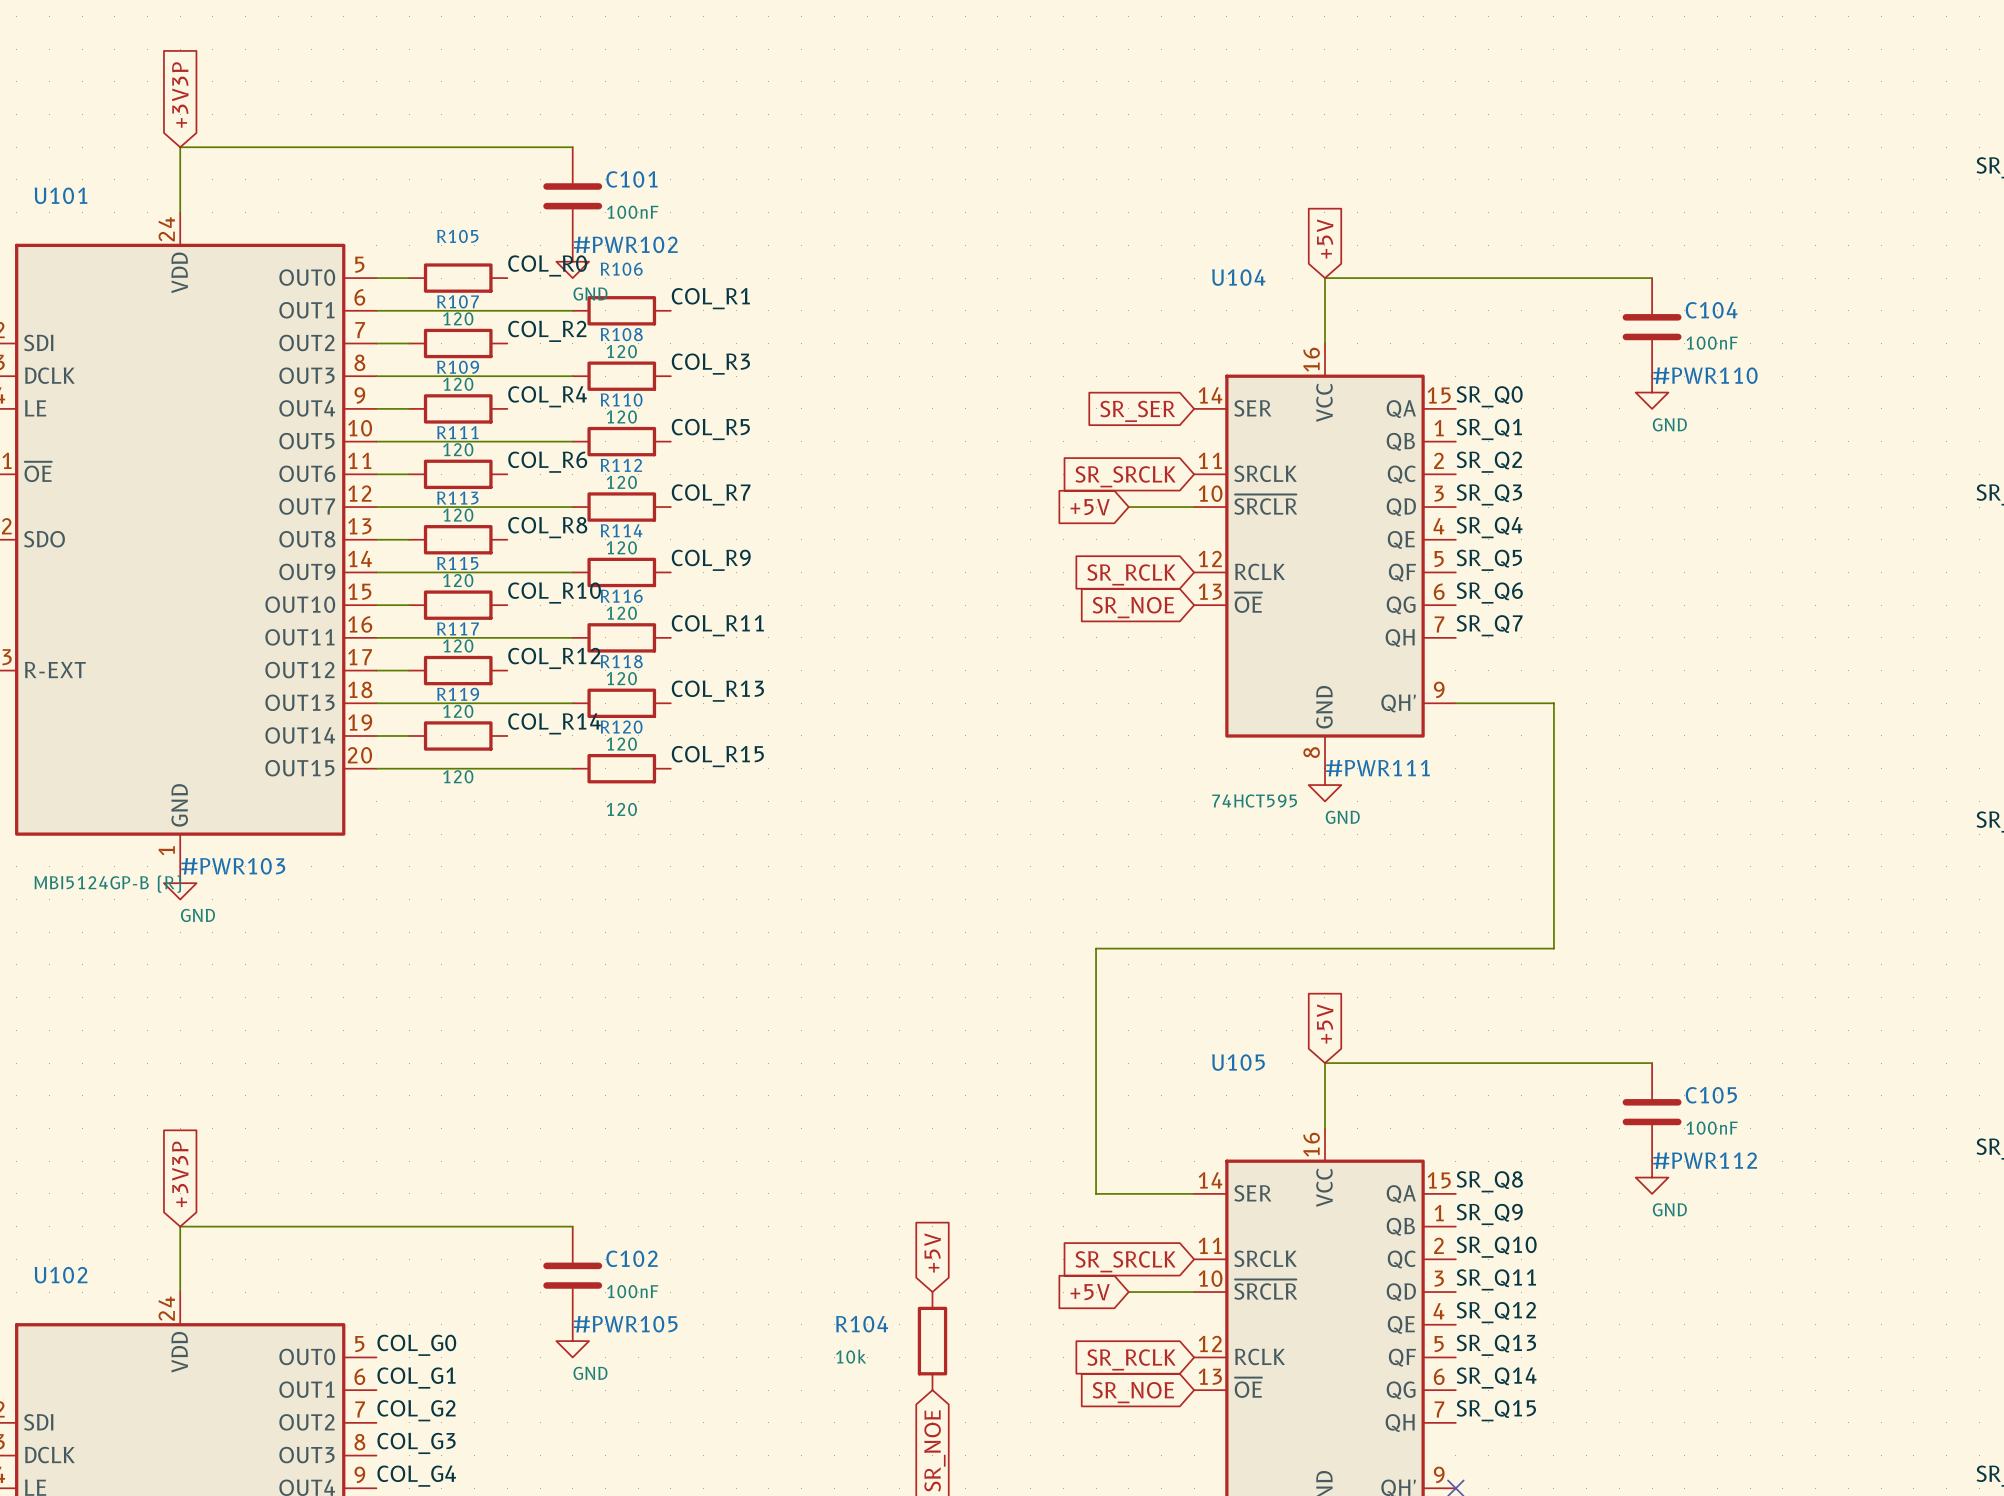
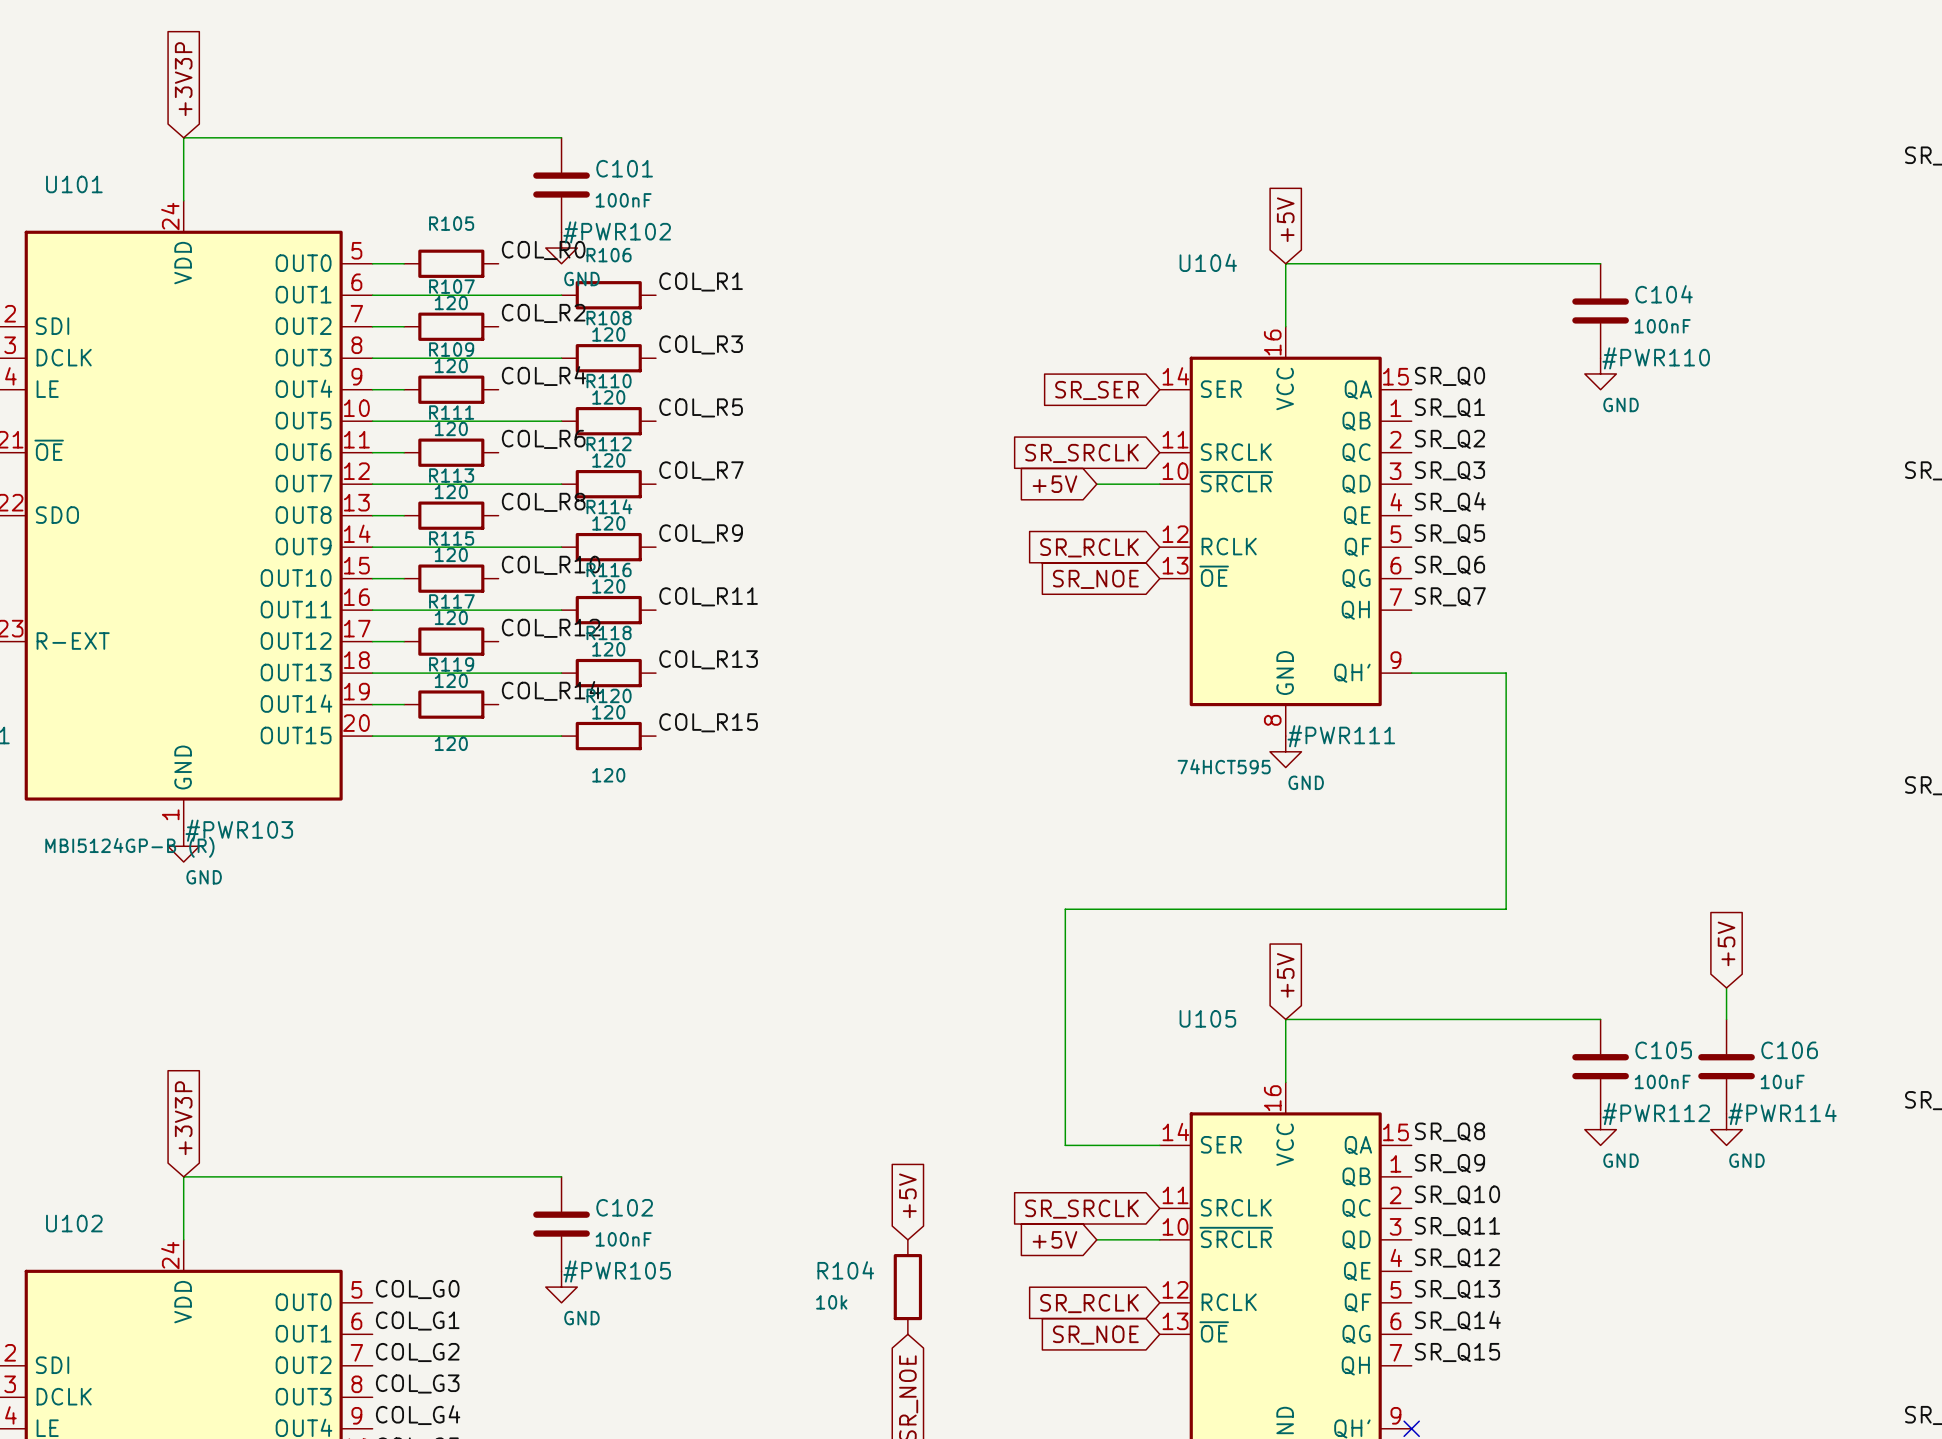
global label: none -> +5V (1726, 943)
wire: none -> (1726, 987) (1726, 1019)
C106: none -> 10uF (1726, 1066)
#PWR114: none -> GND (1726, 1129)

